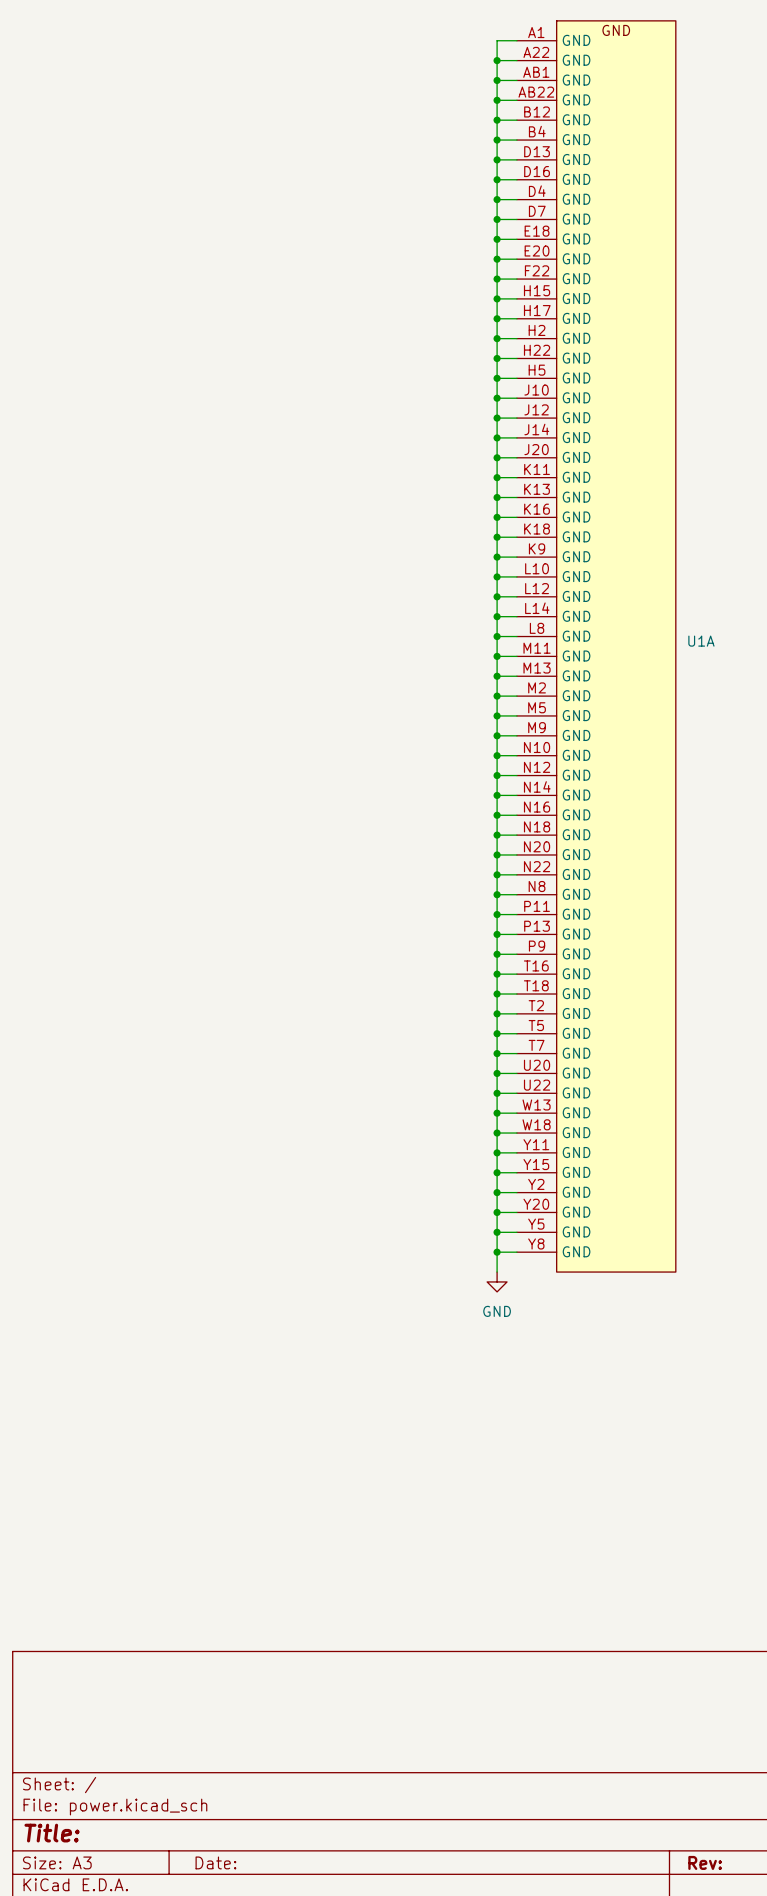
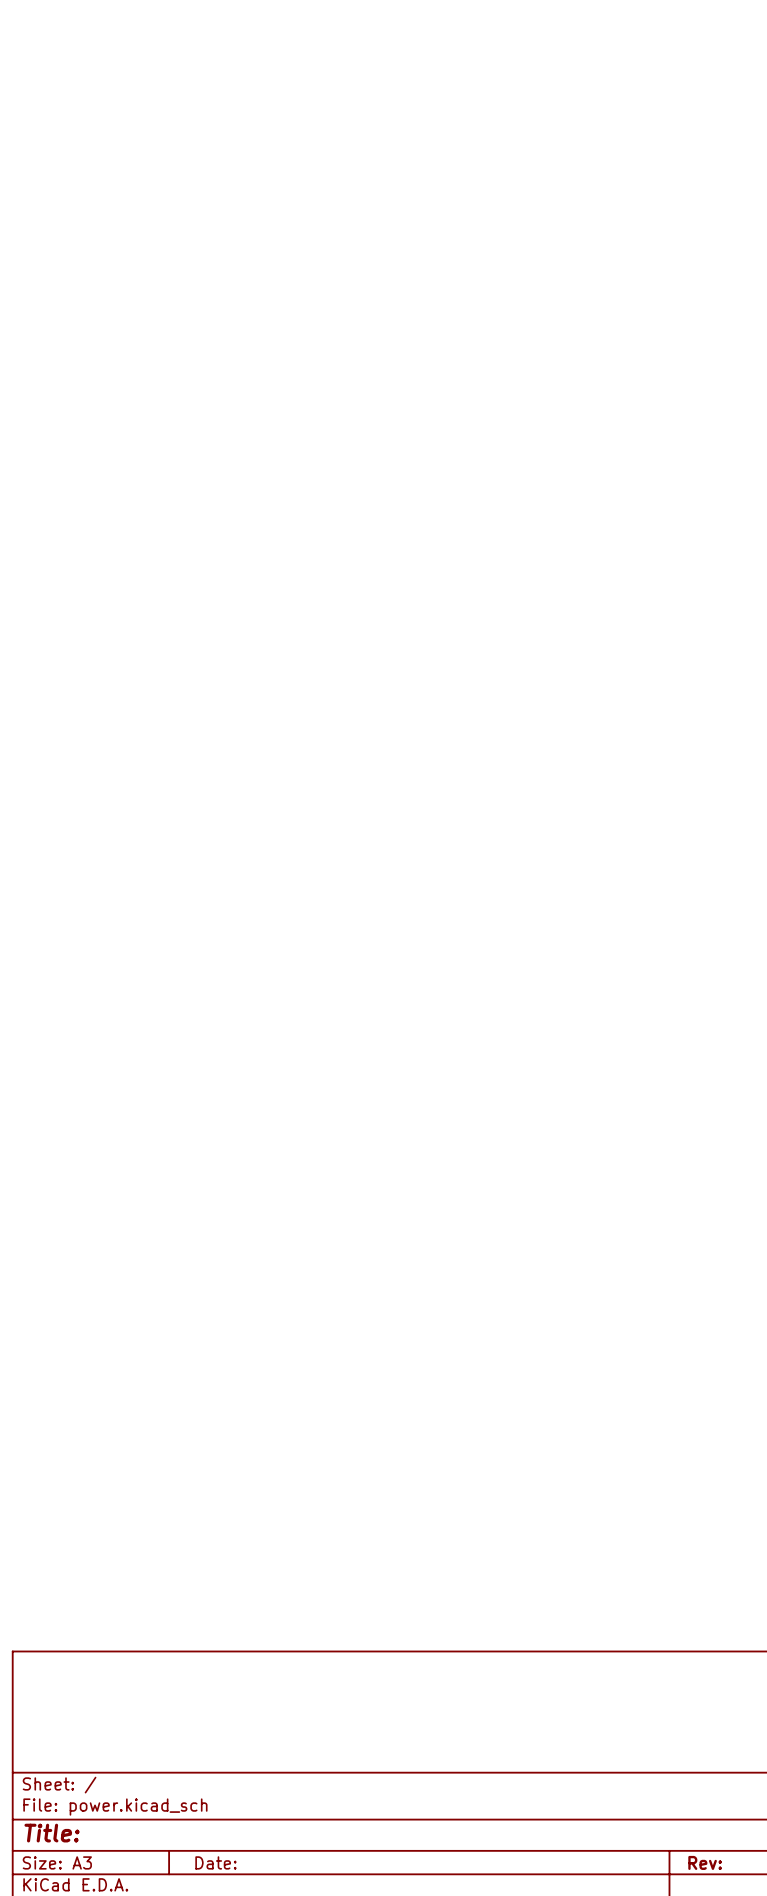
wire: (516, 40) (497, 40) (497, 1272) -> none
wire: (497, 60) (516, 60) -> none
junction: (497, 60) -> none
wire: (497, 80) (516, 80) -> none
junction: (497, 80) -> none
wire: (497, 100) (516, 100) -> none
junction: (497, 100) -> none
wire: (497, 120) (516, 120) -> none
junction: (497, 120) -> none
wire: (497, 140) (516, 140) -> none
junction: (497, 140) -> none
wire: (497, 159) (516, 159) -> none
junction: (497, 159) -> none
wire: (497, 179) (516, 179) -> none
junction: (497, 179) -> none
wire: (497, 199) (516, 199) -> none
junction: (497, 199) -> none
wire: (497, 219) (516, 219) -> none
junction: (497, 219) -> none
wire: (497, 239) (516, 239) -> none
junction: (497, 239) -> none
wire: (497, 259) (516, 259) -> none
junction: (497, 259) -> none
wire: (497, 279) (516, 279) -> none
junction: (497, 279) -> none
wire: (497, 298) (516, 298) -> none
junction: (497, 298) -> none
wire: (497, 318) (516, 318) -> none
junction: (497, 318) -> none
wire: (497, 338) (516, 338) -> none
junction: (497, 338) -> none
wire: (497, 358) (516, 358) -> none
junction: (497, 358) -> none
wire: (497, 378) (516, 378) -> none
junction: (497, 378) -> none
wire: (497, 398) (516, 398) -> none
junction: (497, 398) -> none
wire: (497, 418) (516, 418) -> none
junction: (497, 418) -> none
wire: (497, 437) (516, 437) -> none
junction: (497, 437) -> none
wire: (497, 457) (516, 457) -> none
junction: (497, 457) -> none
wire: (497, 477) (516, 477) -> none
junction: (497, 477) -> none
wire: (497, 497) (516, 497) -> none
junction: (497, 497) -> none
wire: (497, 517) (516, 517) -> none
junction: (497, 517) -> none
wire: (497, 537) (516, 537) -> none
junction: (497, 537) -> none
wire: (497, 557) (516, 557) -> none
junction: (497, 557) -> none
wire: (497, 576) (516, 576) -> none
junction: (497, 576) -> none
wire: (497, 596) (516, 596) -> none
junction: (497, 596) -> none
wire: (497, 616) (516, 616) -> none
junction: (497, 616) -> none
wire: (497, 636) (516, 636) -> none
junction: (497, 636) -> none
U1A: (596, 646) -> none
wire: (497, 656) (516, 656) -> none
junction: (497, 656) -> none
wire: (497, 676) (516, 676) -> none
junction: (497, 676) -> none
wire: (497, 696) (516, 696) -> none
junction: (497, 696) -> none
wire: (497, 715) (516, 715) -> none
junction: (497, 715) -> none
wire: (497, 735) (516, 735) -> none
junction: (497, 735) -> none
wire: (497, 755) (516, 755) -> none
junction: (497, 755) -> none
wire: (497, 775) (516, 775) -> none
junction: (497, 775) -> none
wire: (497, 795) (516, 795) -> none
junction: (497, 795) -> none
wire: (497, 815) (516, 815) -> none
junction: (497, 815) -> none
wire: (497, 835) (516, 835) -> none
junction: (497, 835) -> none
wire: (497, 854) (516, 854) -> none
junction: (497, 854) -> none
wire: (497, 874) (516, 874) -> none
junction: (497, 874) -> none
wire: (497, 894) (516, 894) -> none
junction: (497, 894) -> none
wire: (497, 914) (516, 914) -> none
junction: (497, 914) -> none
wire: (497, 934) (516, 934) -> none
junction: (497, 934) -> none
wire: (497, 954) (516, 954) -> none
junction: (497, 954) -> none
wire: (497, 974) (516, 974) -> none
junction: (497, 974) -> none
wire: (497, 994) (516, 994) -> none
junction: (497, 994) -> none
wire: (497, 1013) (516, 1013) -> none
junction: (497, 1013) -> none
wire: (497, 1033) (516, 1033) -> none
junction: (497, 1033) -> none
wire: (497, 1053) (516, 1053) -> none
junction: (497, 1053) -> none
wire: (497, 1073) (516, 1073) -> none
junction: (497, 1073) -> none
wire: (497, 1093) (516, 1093) -> none
junction: (497, 1093) -> none
wire: (497, 1113) (516, 1113) -> none
junction: (497, 1113) -> none
wire: (497, 1133) (516, 1133) -> none
junction: (497, 1133) -> none
wire: (497, 1152) (516, 1152) -> none
junction: (497, 1152) -> none
wire: (497, 1172) (516, 1172) -> none
junction: (497, 1172) -> none
wire: (497, 1192) (516, 1192) -> none
junction: (497, 1192) -> none
wire: (497, 1212) (516, 1212) -> none
junction: (497, 1212) -> none
wire: (497, 1232) (516, 1232) -> none
junction: (497, 1232) -> none
wire: (497, 1252) (516, 1252) -> none
junction: (497, 1252) -> none
power symbol: GND (497, 1281) -> none

